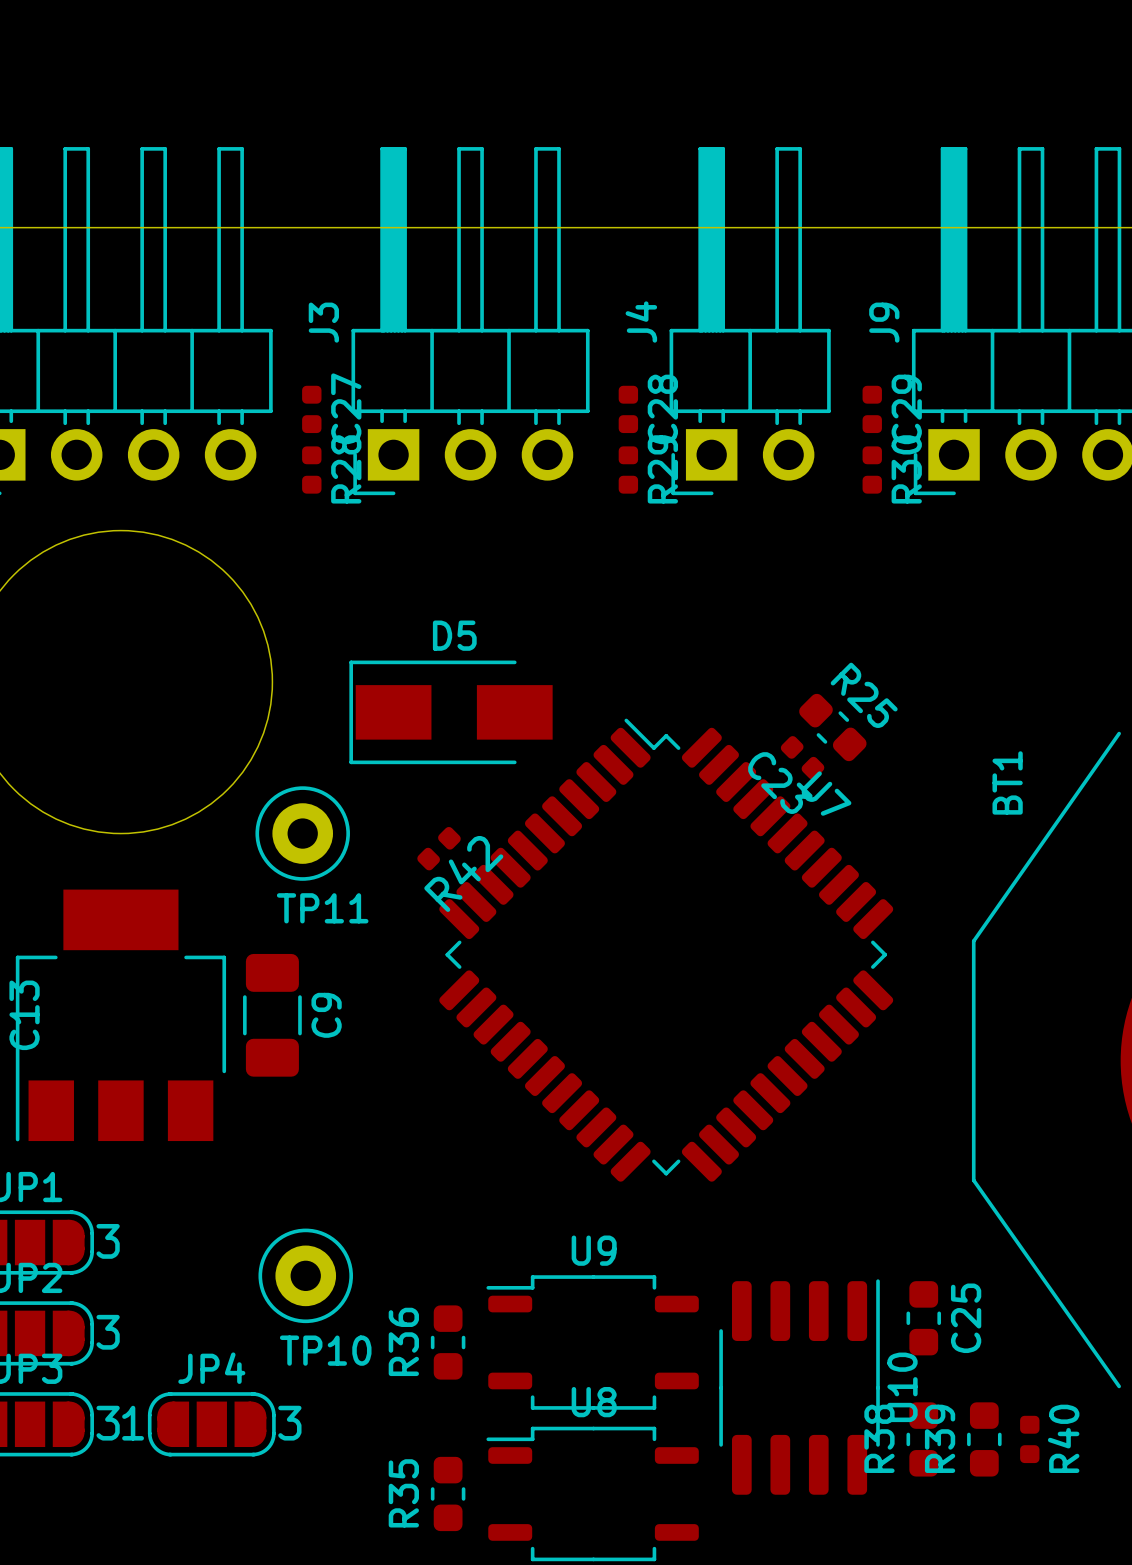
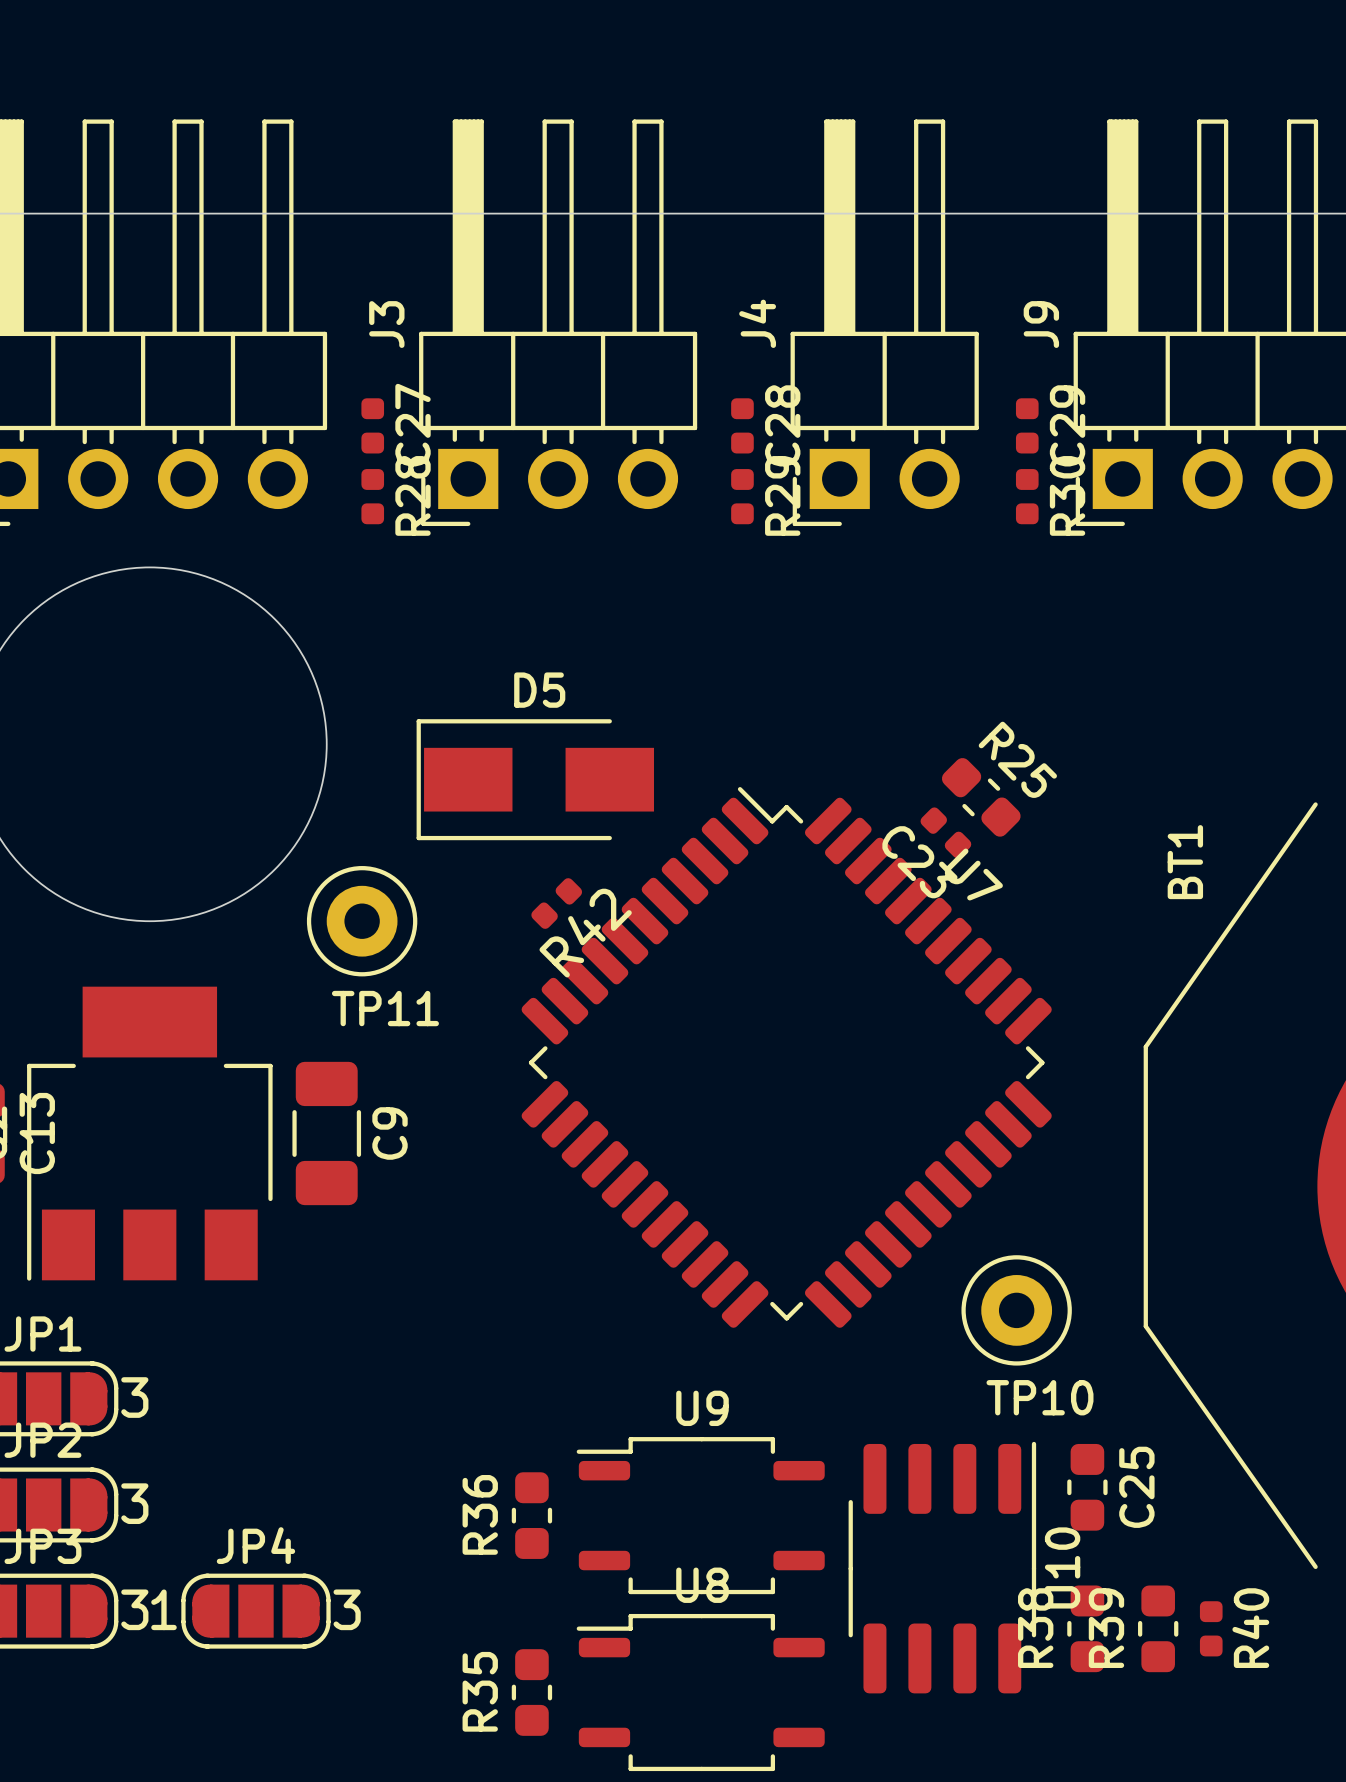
R42 position: (439, 848) -> (556, 903)
TP10 position: (305, 1275) -> (1016, 1310)

